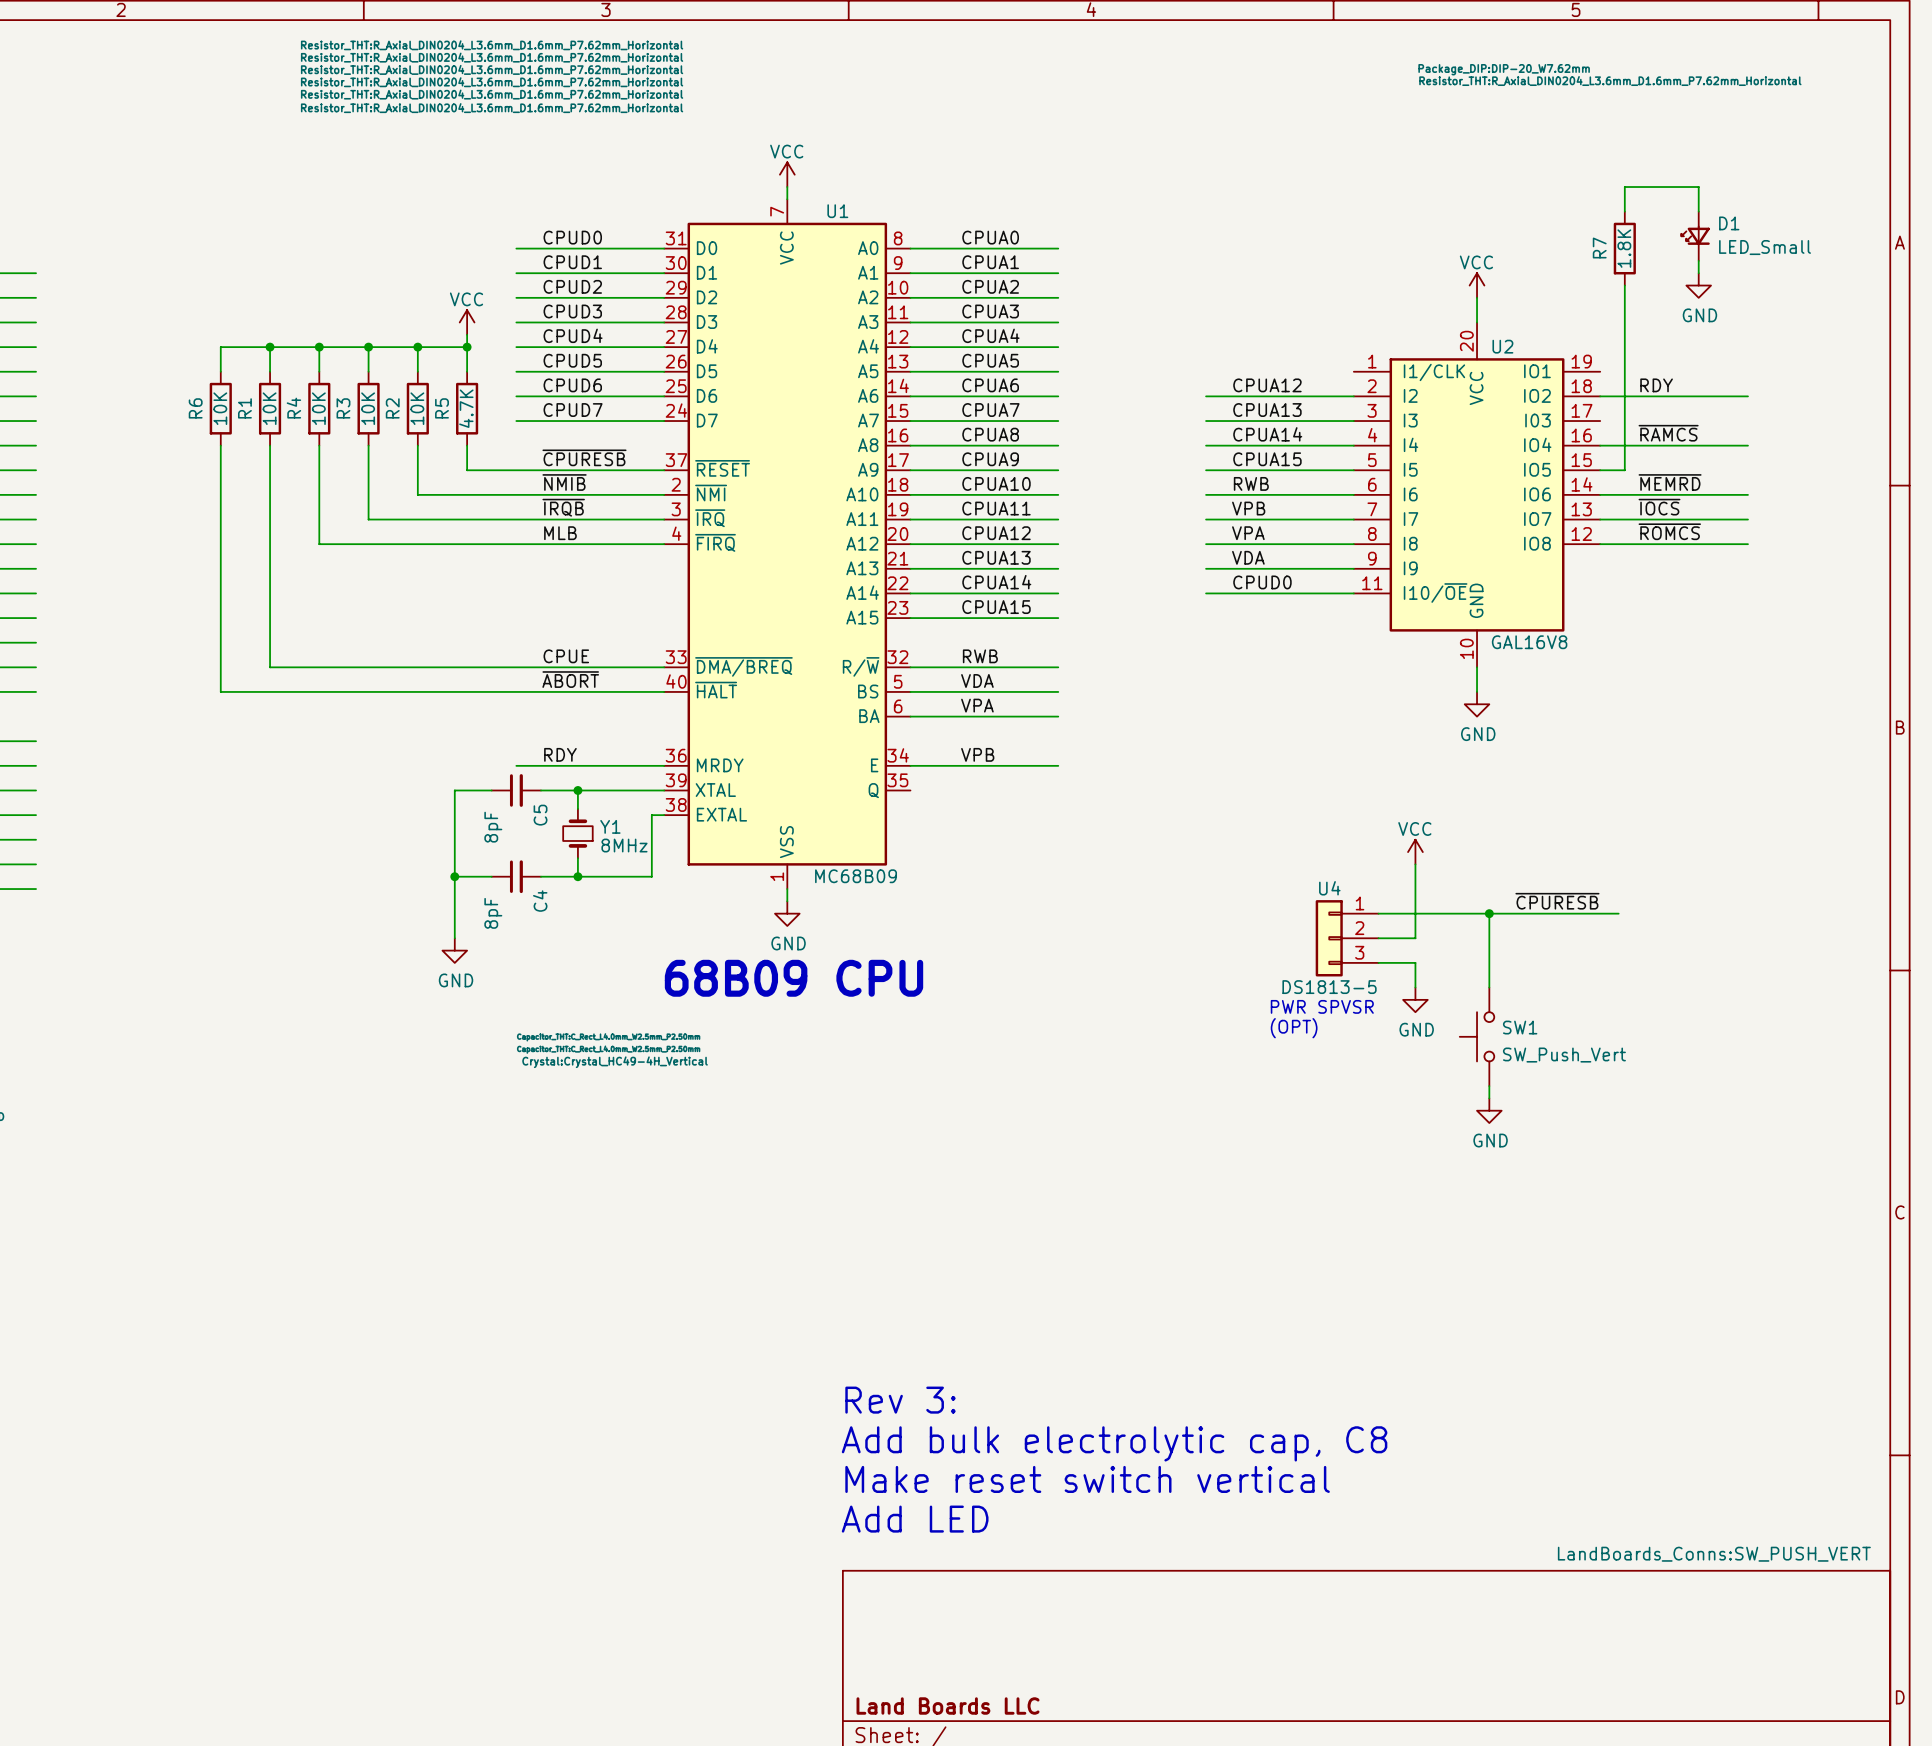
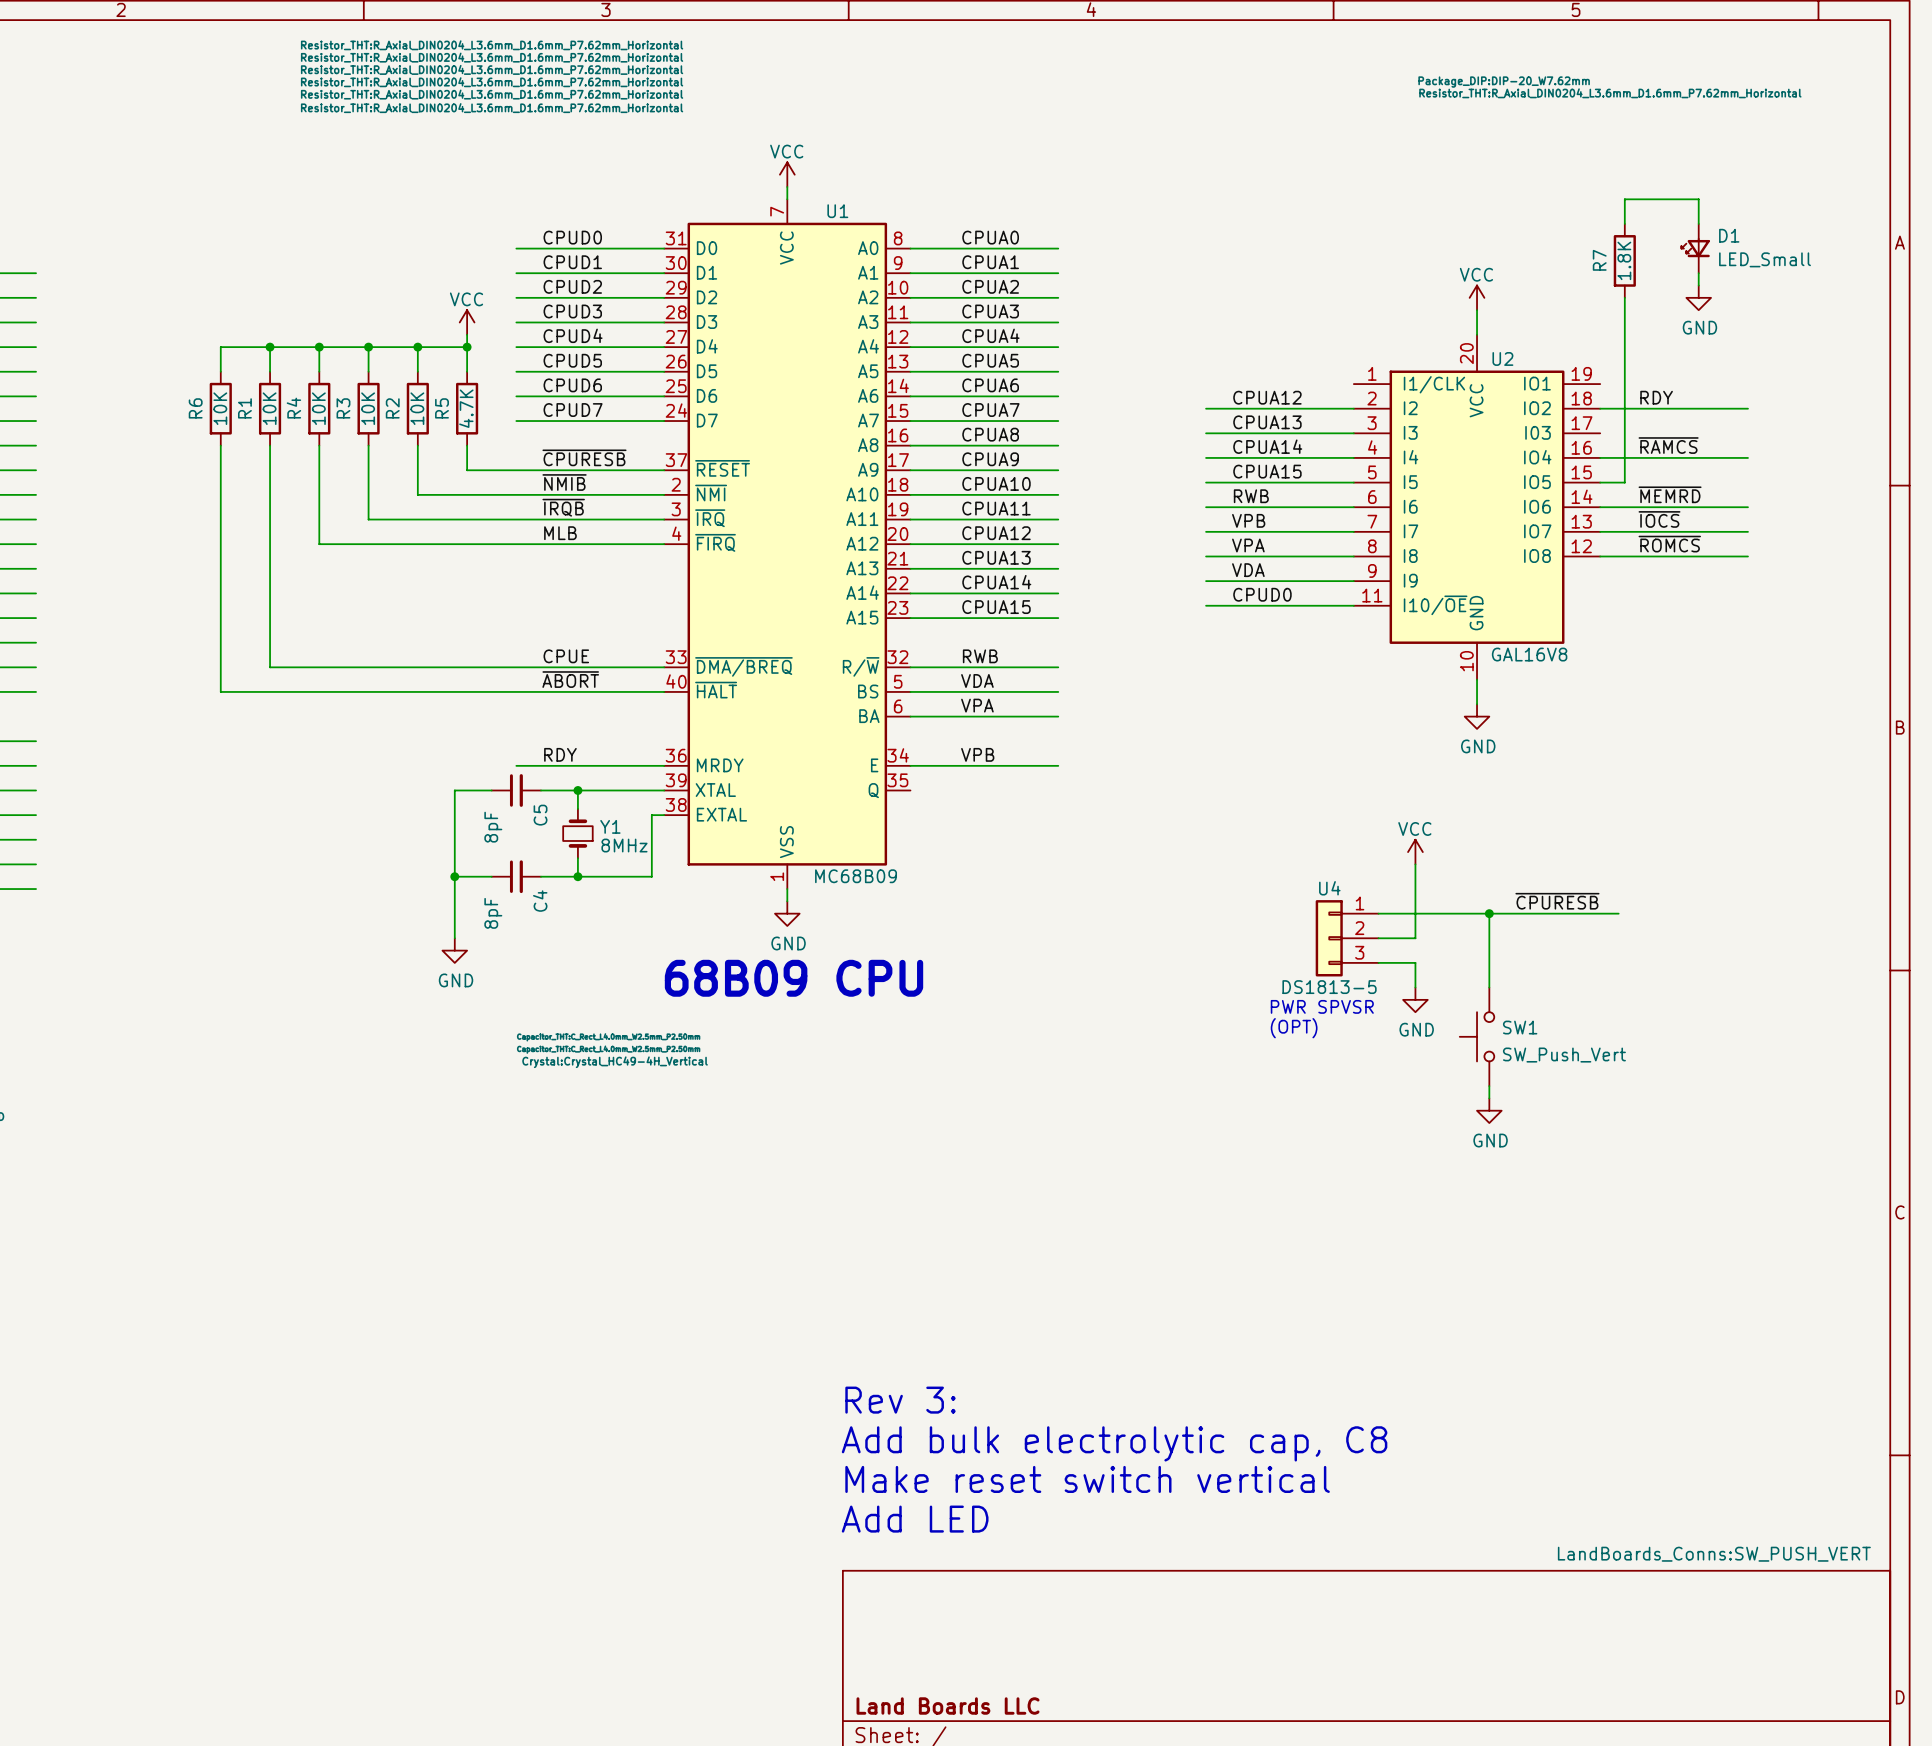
wire: (1624, 199) (1624, 187) (1698, 187) (1698, 199) -> (1624, 199) (1698, 199)
D1 position: (1695, 236) -> (1695, 248)
R7 position: (1624, 248) -> (1624, 260)
power symbol position: VCC (1477, 285) -> VCC (1477, 297)
power symbol position: GND (1698, 285) -> GND (1698, 297)
label position: CPUA12 (1267, 385) -> CPUA12 (1267, 397)
label position: RDY (1656, 385) -> RDY (1656, 397)
wire: (1206, 396) (1353, 396) -> (1206, 408) (1353, 408)
wire: (1600, 396) (1747, 396) -> (1600, 408) (1747, 408)
label position: CPUA13 (1267, 410) -> CPUA13 (1267, 422)
wire: (1206, 421) (1353, 421) -> (1206, 433) (1353, 433)
label position: ~{RAMCS} (1668, 433) -> ~{RAMCS} (1668, 445)
label position: CPUA14 (1267, 434) -> CPUA14 (1267, 446)
wire: (1206, 445) (1353, 445) -> (1206, 457) (1353, 457)
wire: (1600, 445) (1747, 445) -> (1600, 457) (1747, 457)
label position: CPUA15 (1267, 459) -> CPUA15 (1267, 471)
wire: (1206, 470) (1353, 470) -> (1206, 482) (1353, 482)
wire: (1600, 470) (1624, 470) -> (1600, 482) (1624, 482) (1624, 470)
label position: ~{MEMRD} (1670, 482) -> ~{MEMRD} (1670, 494)
label position: RWB (1251, 483) -> RWB (1251, 496)
wire: (1206, 494) (1353, 494) -> (1206, 507) (1353, 507)
U2 position: (1477, 494) -> (1477, 507)
wire: (1600, 494) (1747, 494) -> (1600, 507) (1747, 507)
label position: ~{IOCS} (1659, 507) -> ~{IOCS} (1659, 519)
label position: VPB (1248, 508) -> VPB (1248, 520)
wire: (1206, 519) (1353, 519) -> (1206, 531) (1353, 531)
wire: (1600, 519) (1747, 519) -> (1600, 531) (1747, 531)
label position: ~{ROMCS} (1669, 531) -> ~{ROMCS} (1669, 544)
label position: VPA (1248, 533) -> VPA (1248, 545)
wire: (1206, 544) (1353, 544) -> (1206, 556) (1353, 556)
wire: (1600, 544) (1747, 544) -> (1600, 556) (1747, 556)
label position: VDA (1248, 557) -> VDA (1248, 570)
wire: (1206, 568) (1353, 568) -> (1206, 581) (1353, 581)
label position: CPUD0 (1262, 582) -> CPUD0 (1262, 594)
wire: (1206, 593) (1353, 593) -> (1206, 605) (1353, 605)
power symbol position: GND (1477, 704) -> GND (1477, 716)

